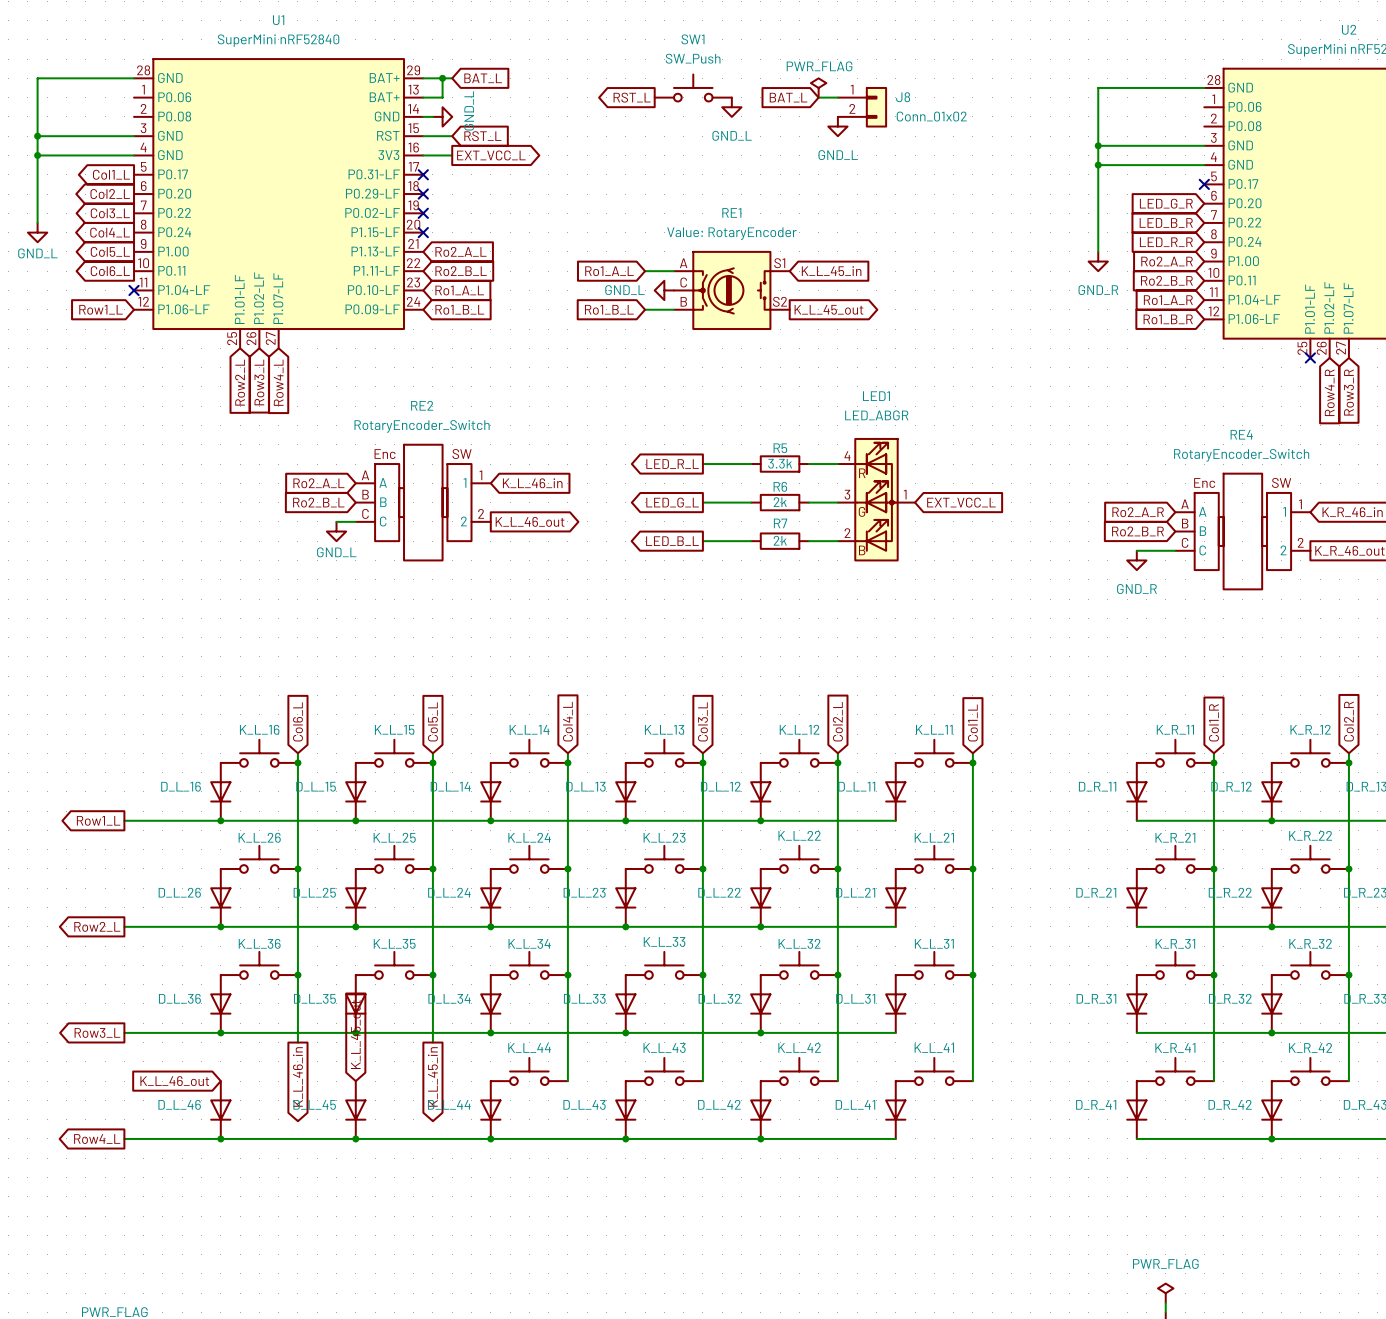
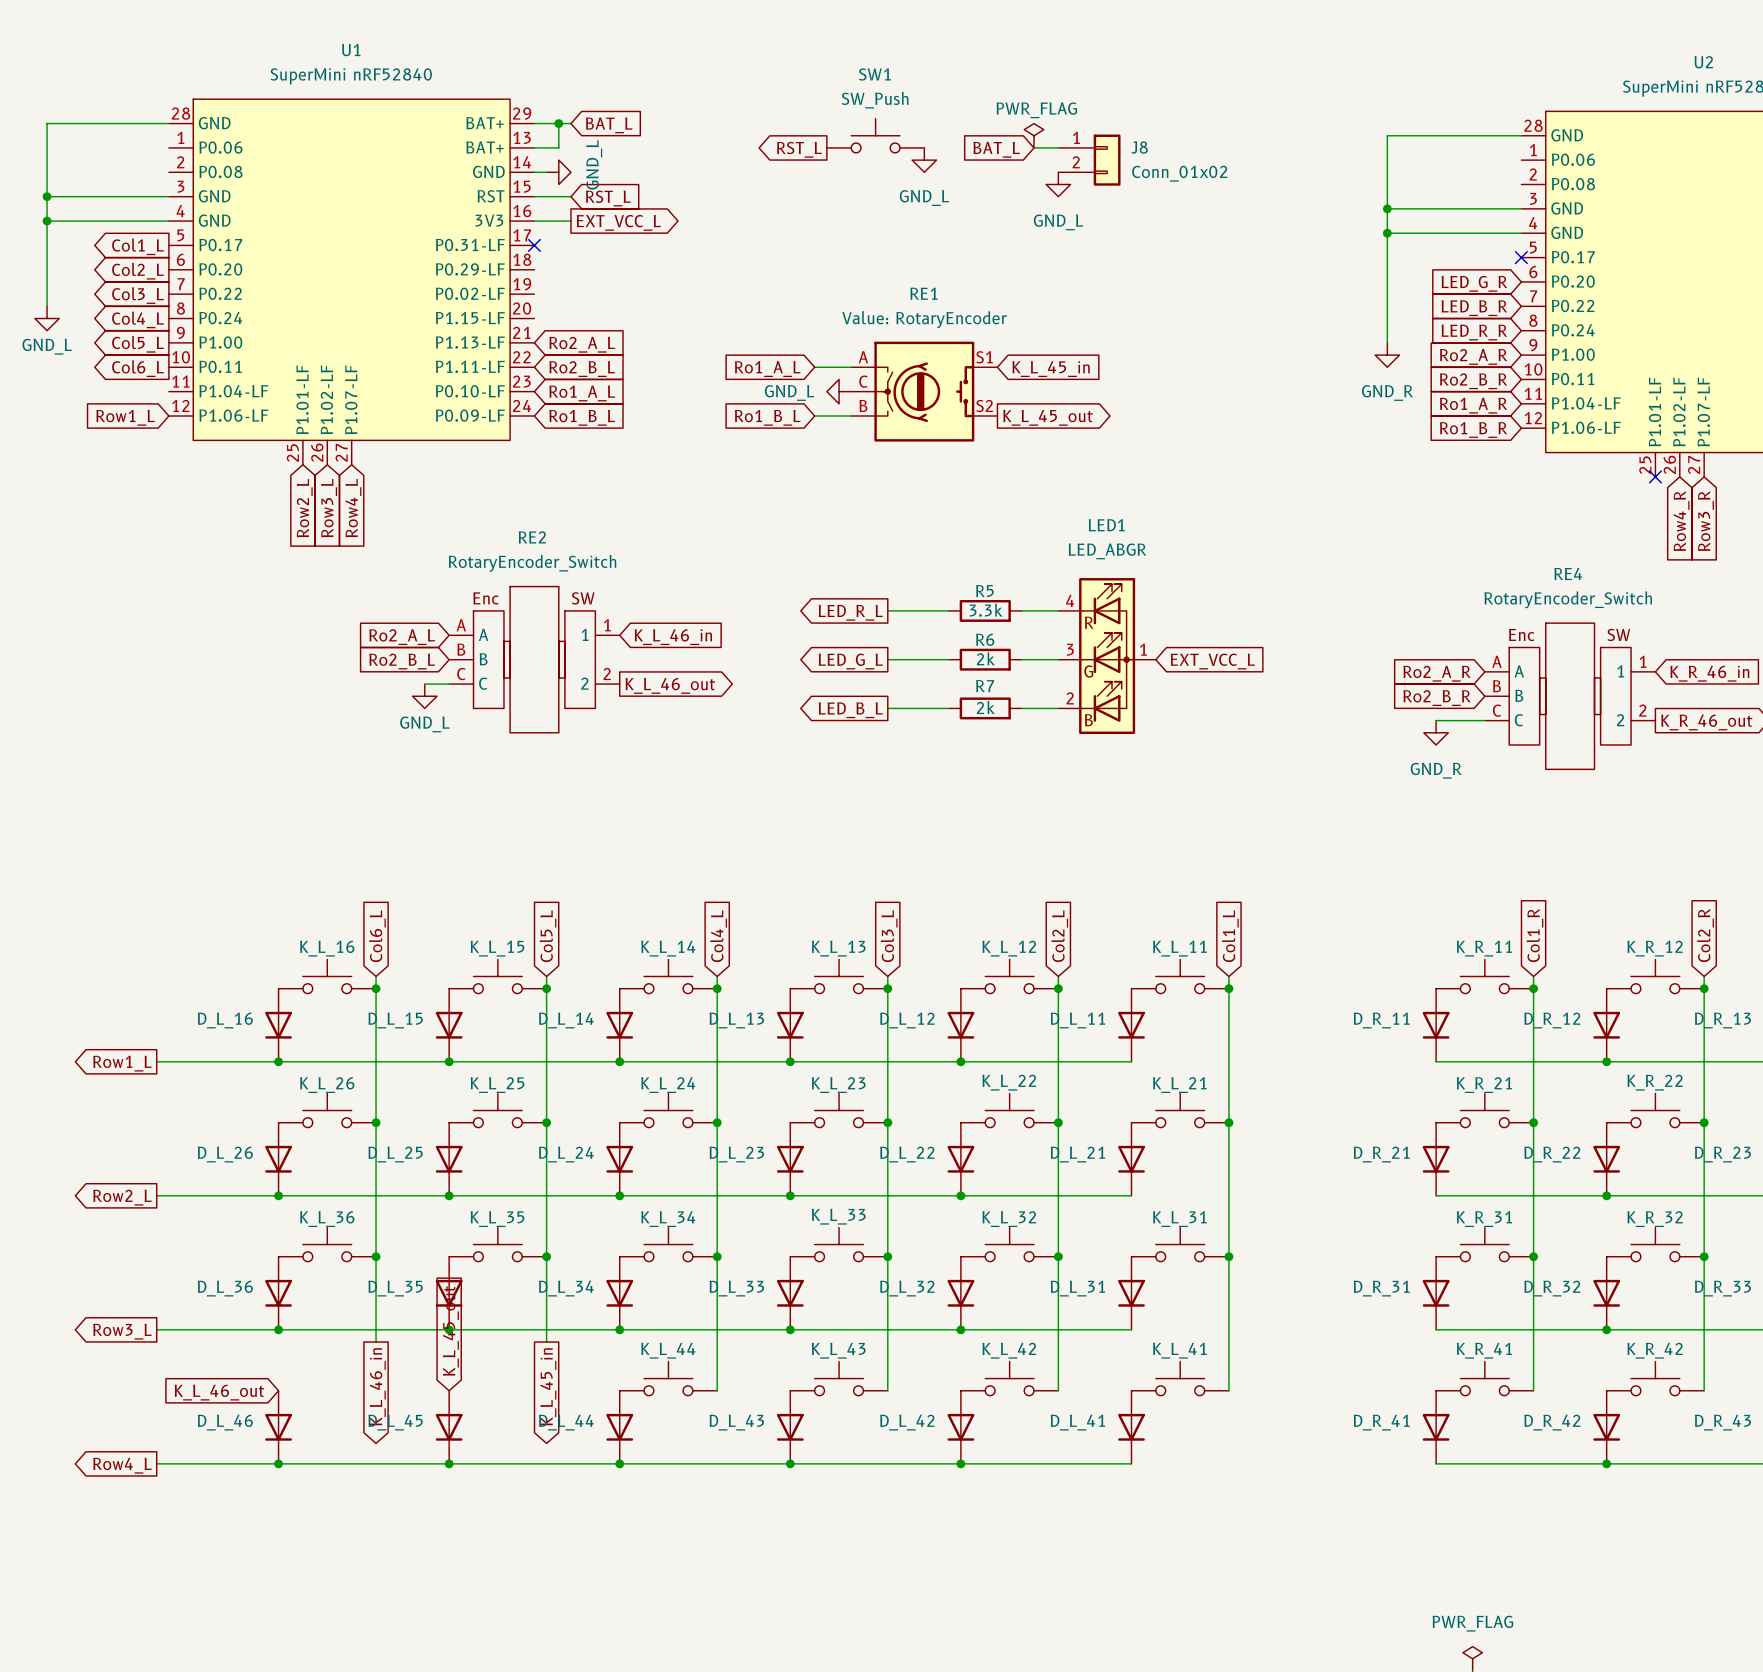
no-connect mark: (423, 194) -> none
no-connect mark: (423, 213) -> none
no-connect mark: (423, 232) -> none
no-connect mark: (134, 290) -> none

